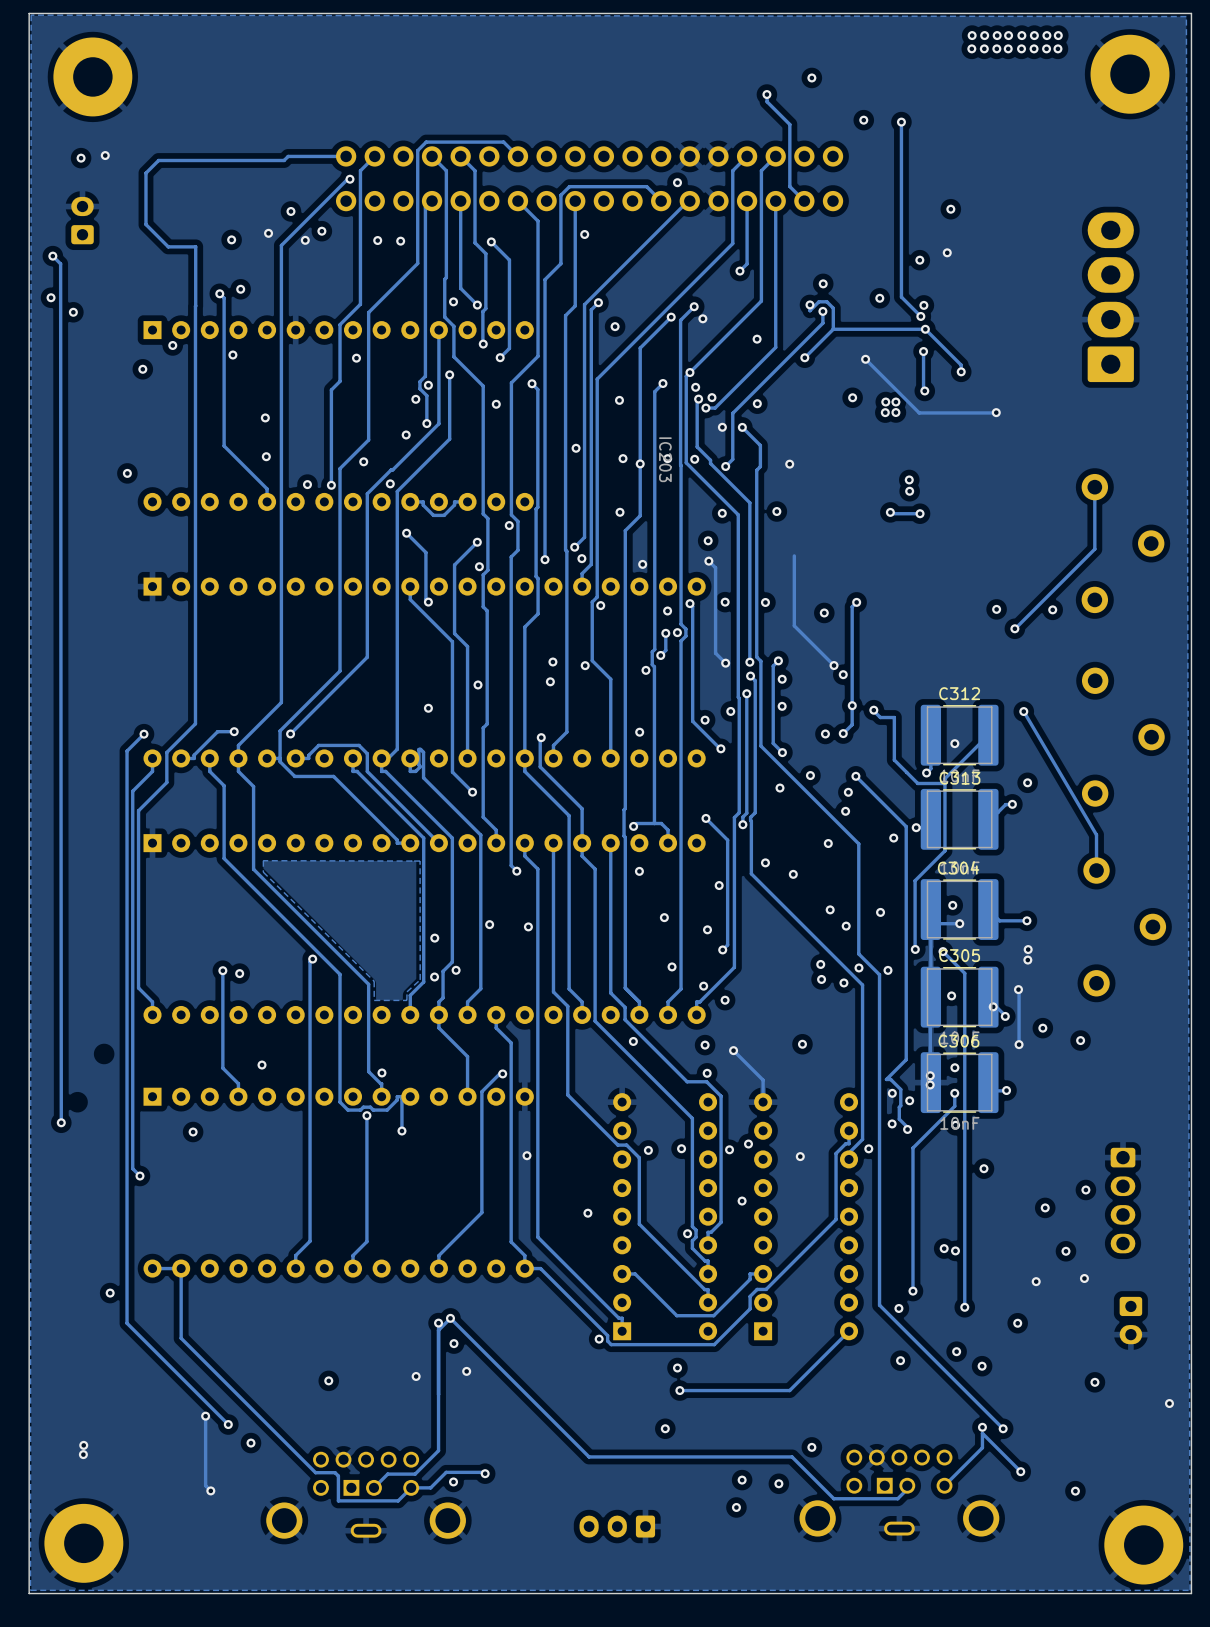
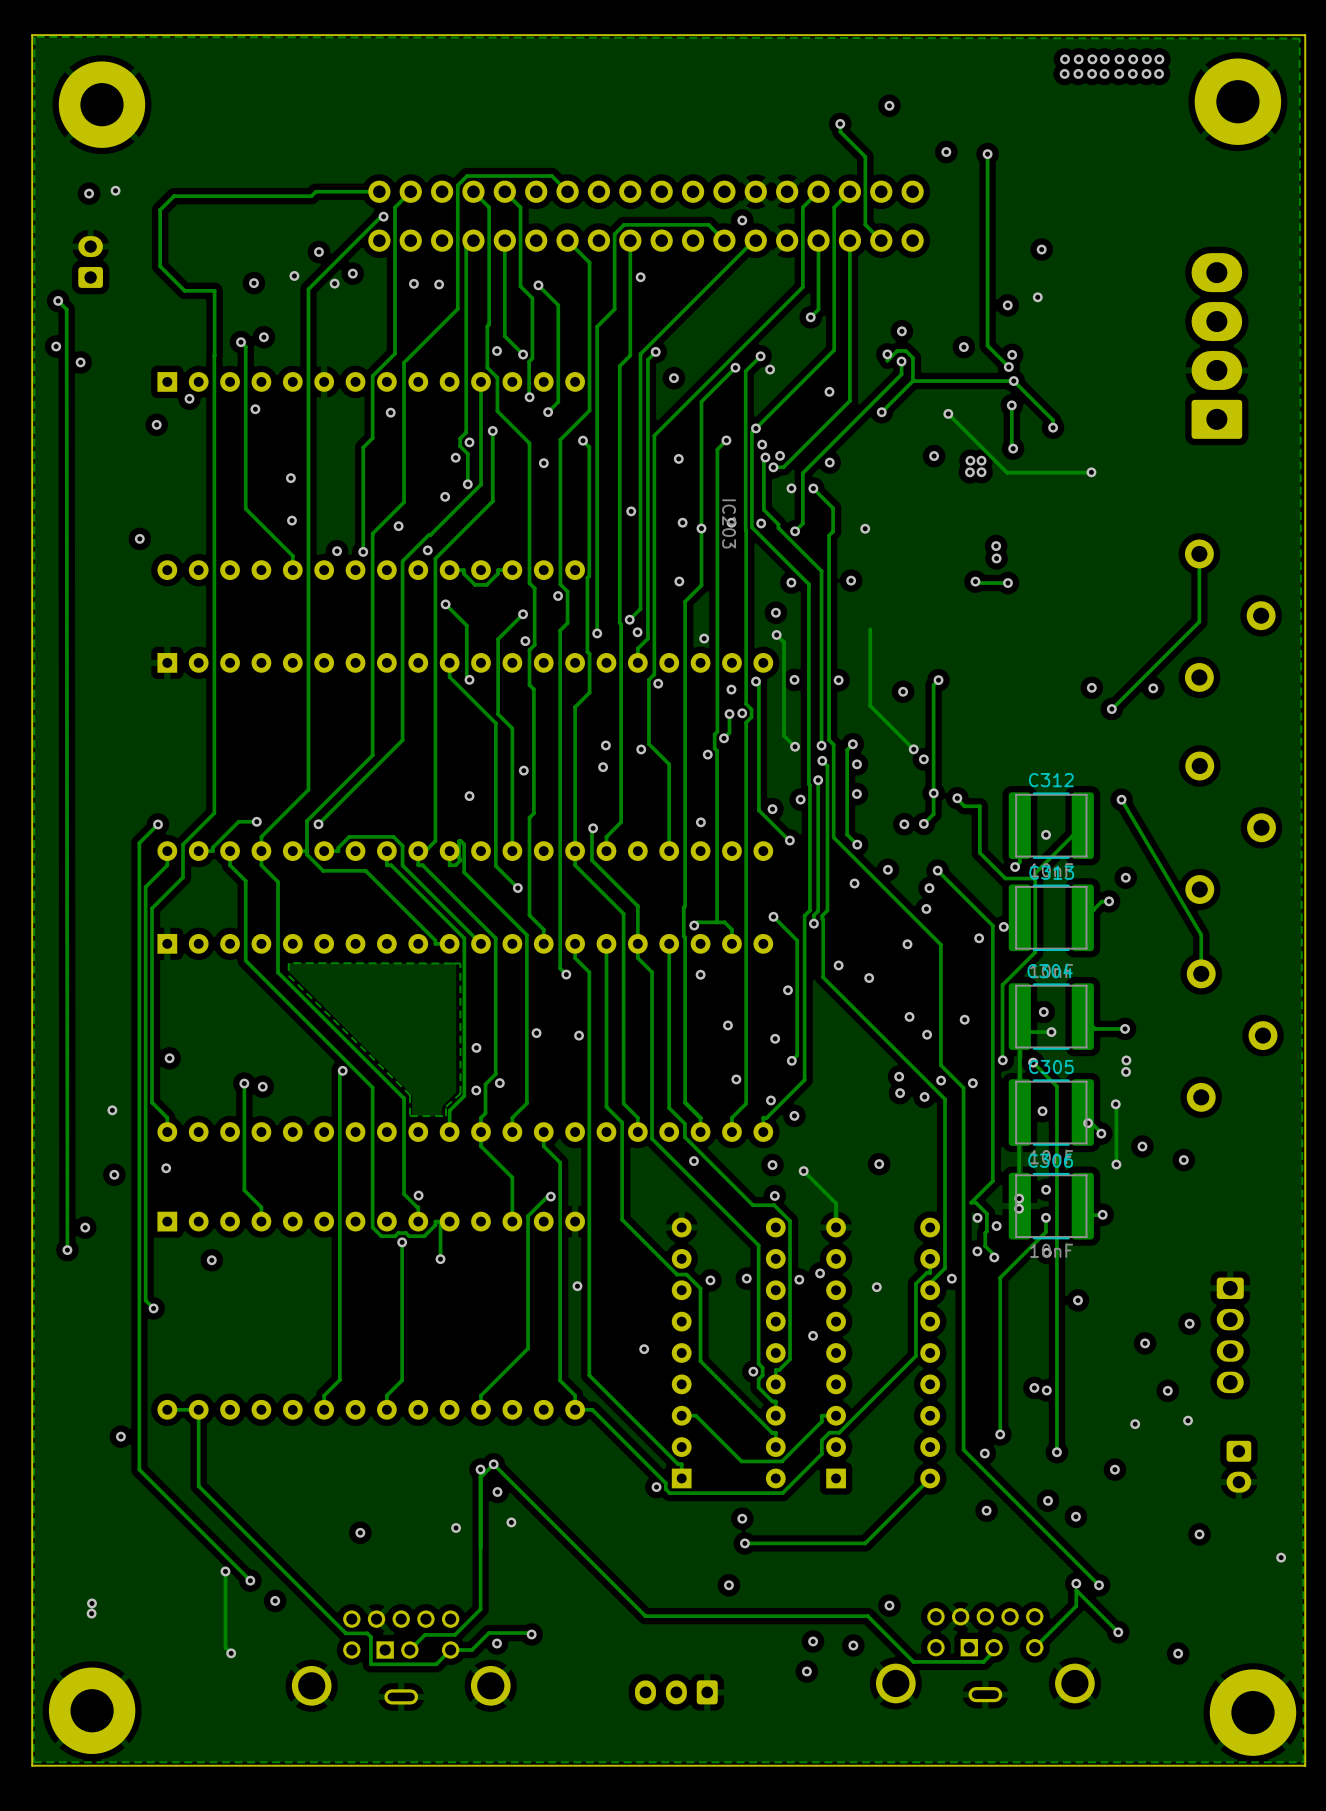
via: none -> (169, 1058)
via: none -> (112, 1110)
via: none -> (166, 1168)
via: none -> (114, 1174)
via: (262, 1065) -> none
via: none -> (85, 1227)

